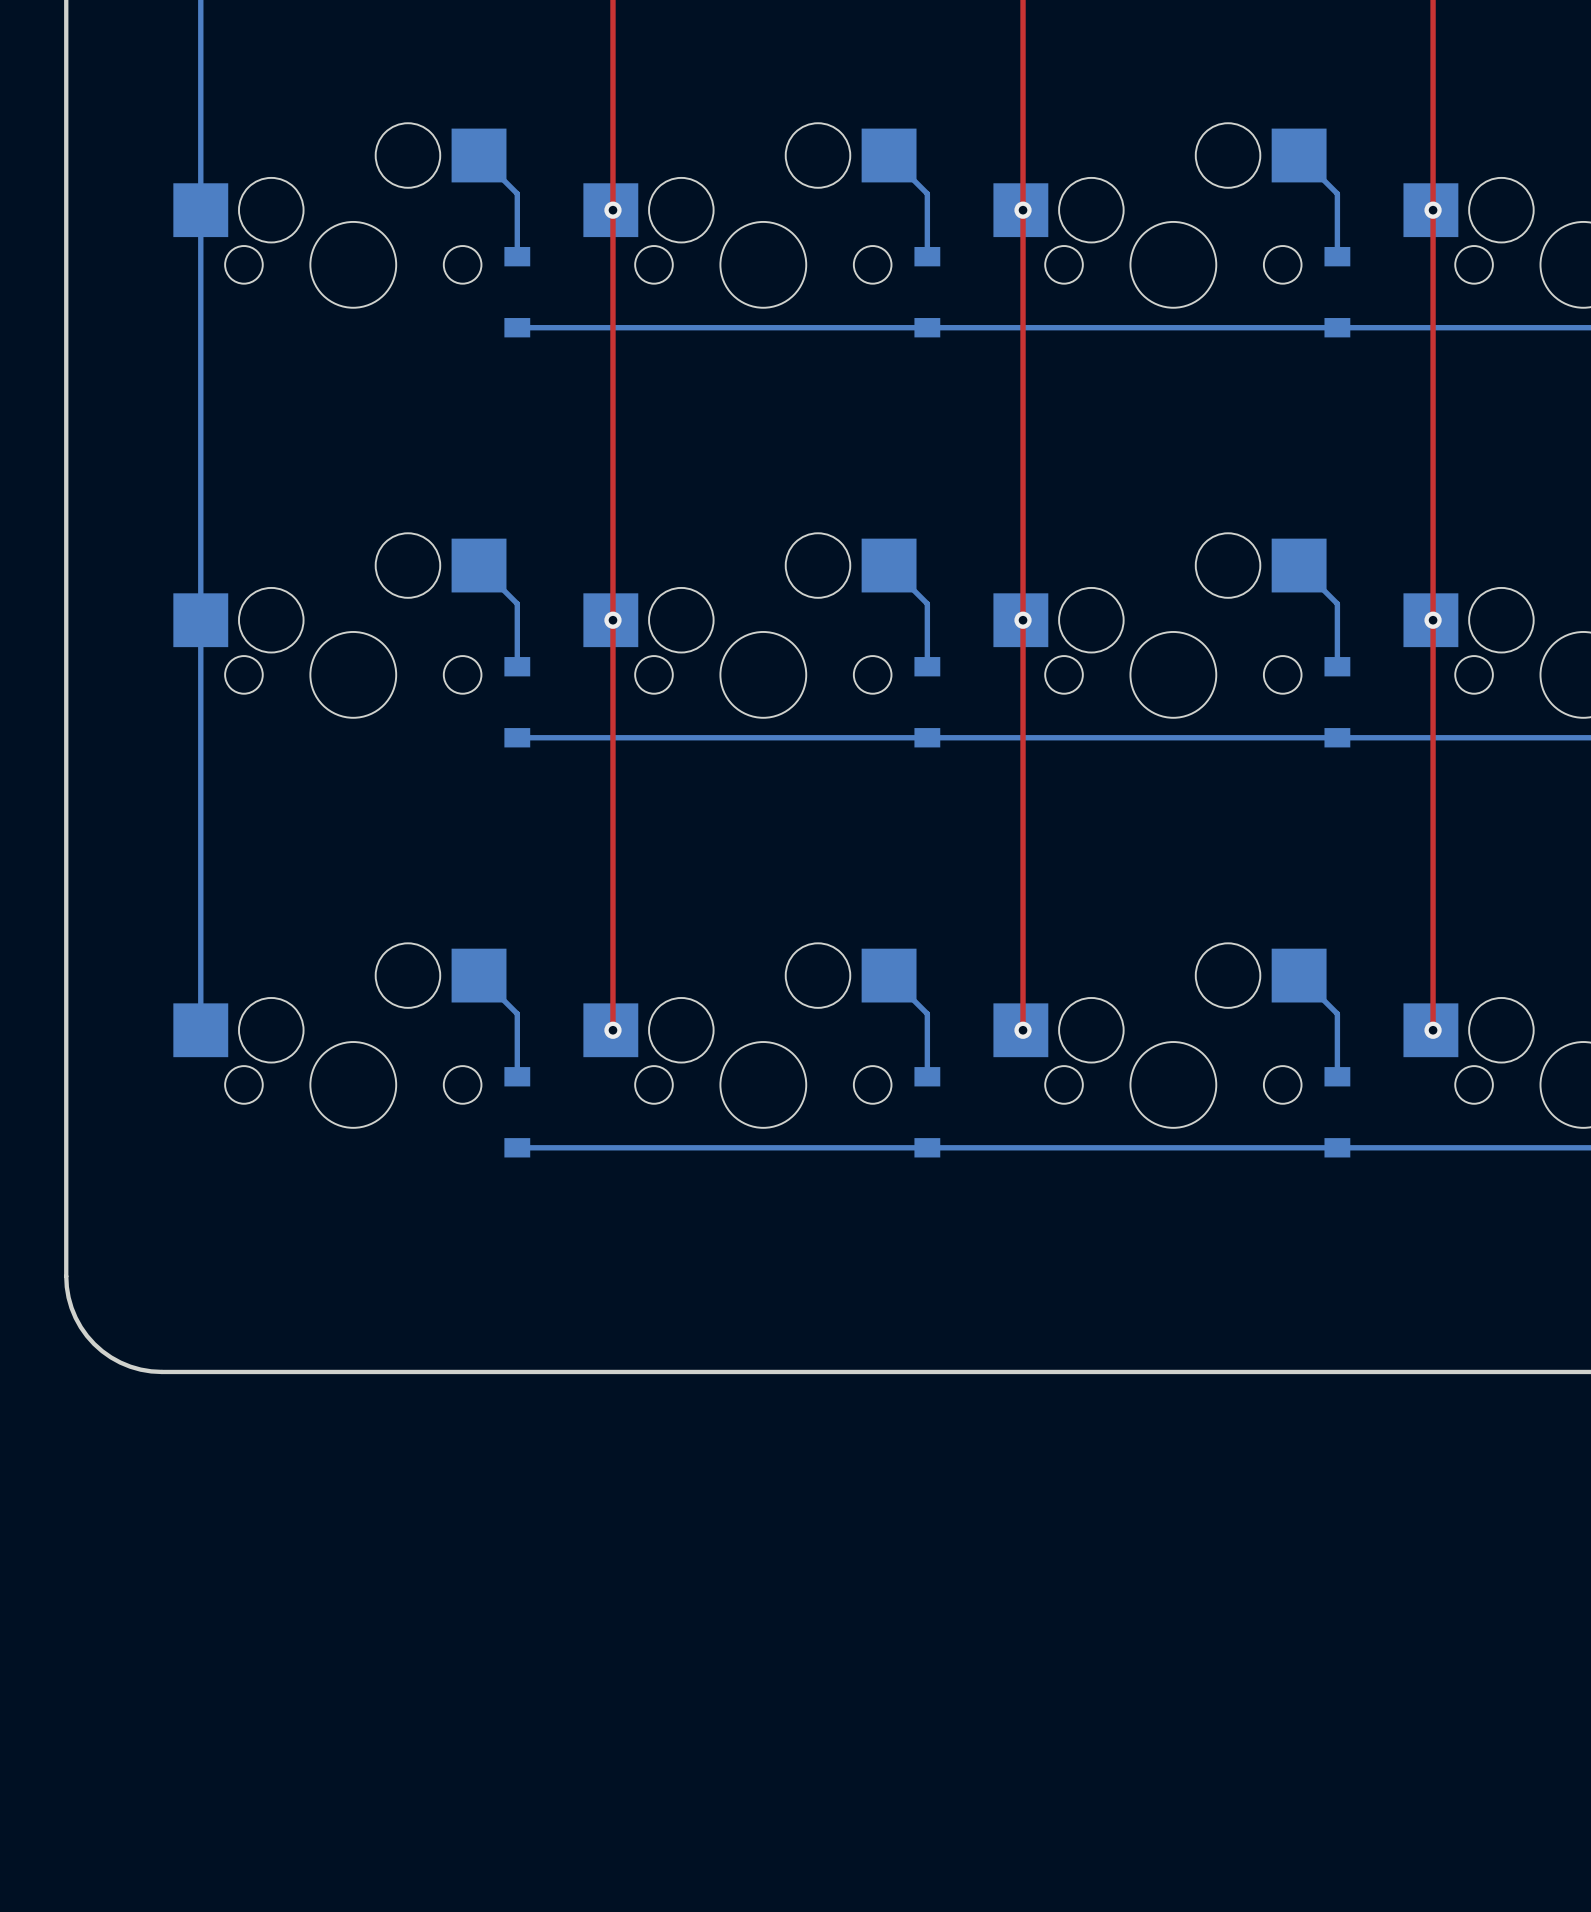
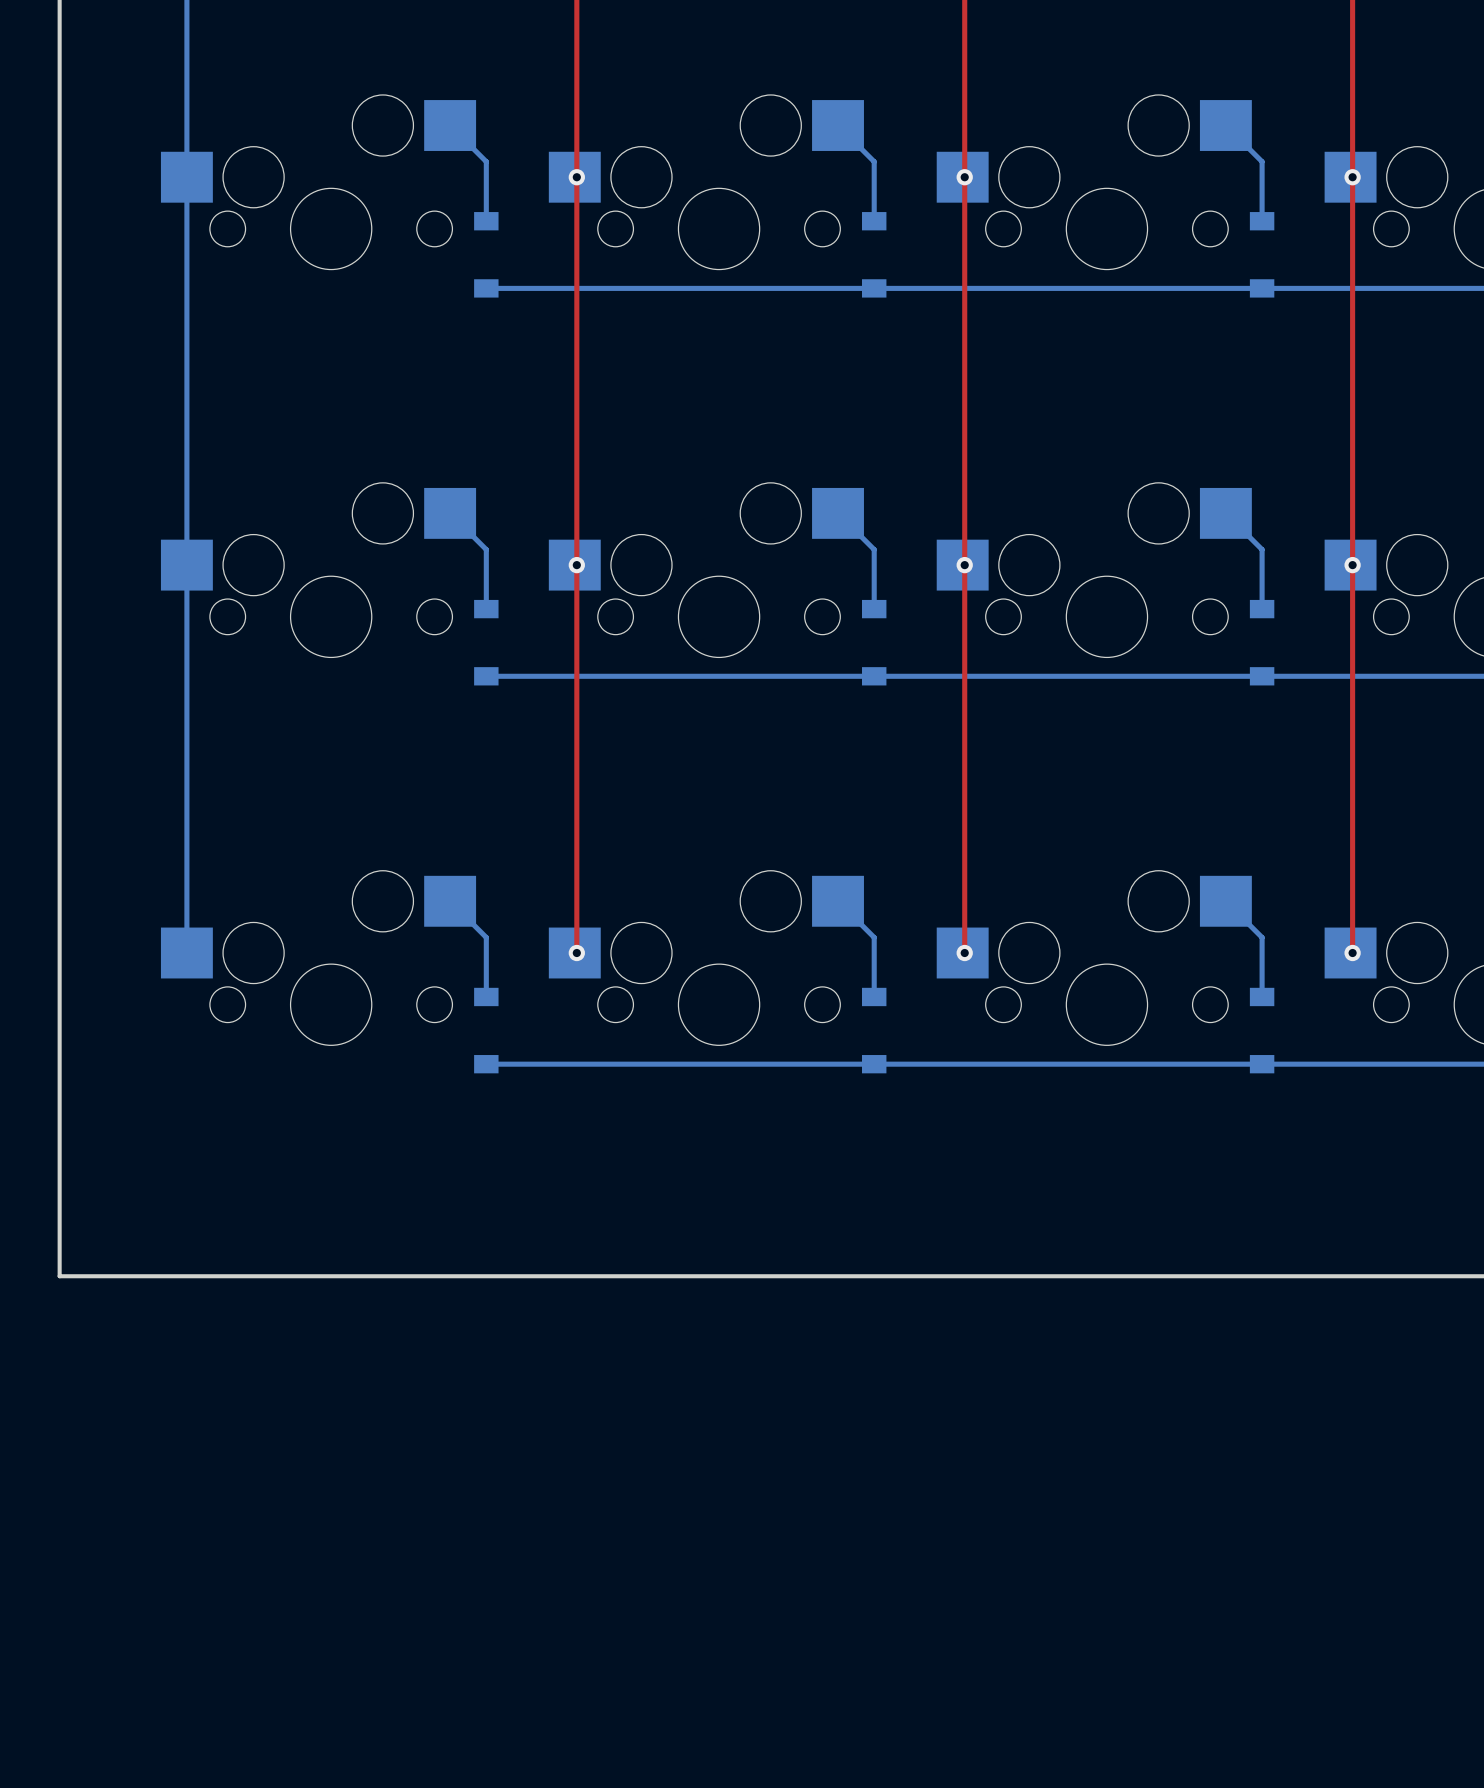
board edge: (66, 1276) (68, 1297) (75, 1317) (94, 1344) (120, 1362) (140, 1369) (161, 1371) -> (59, 1185) (59, 1276) (150, 1276)

